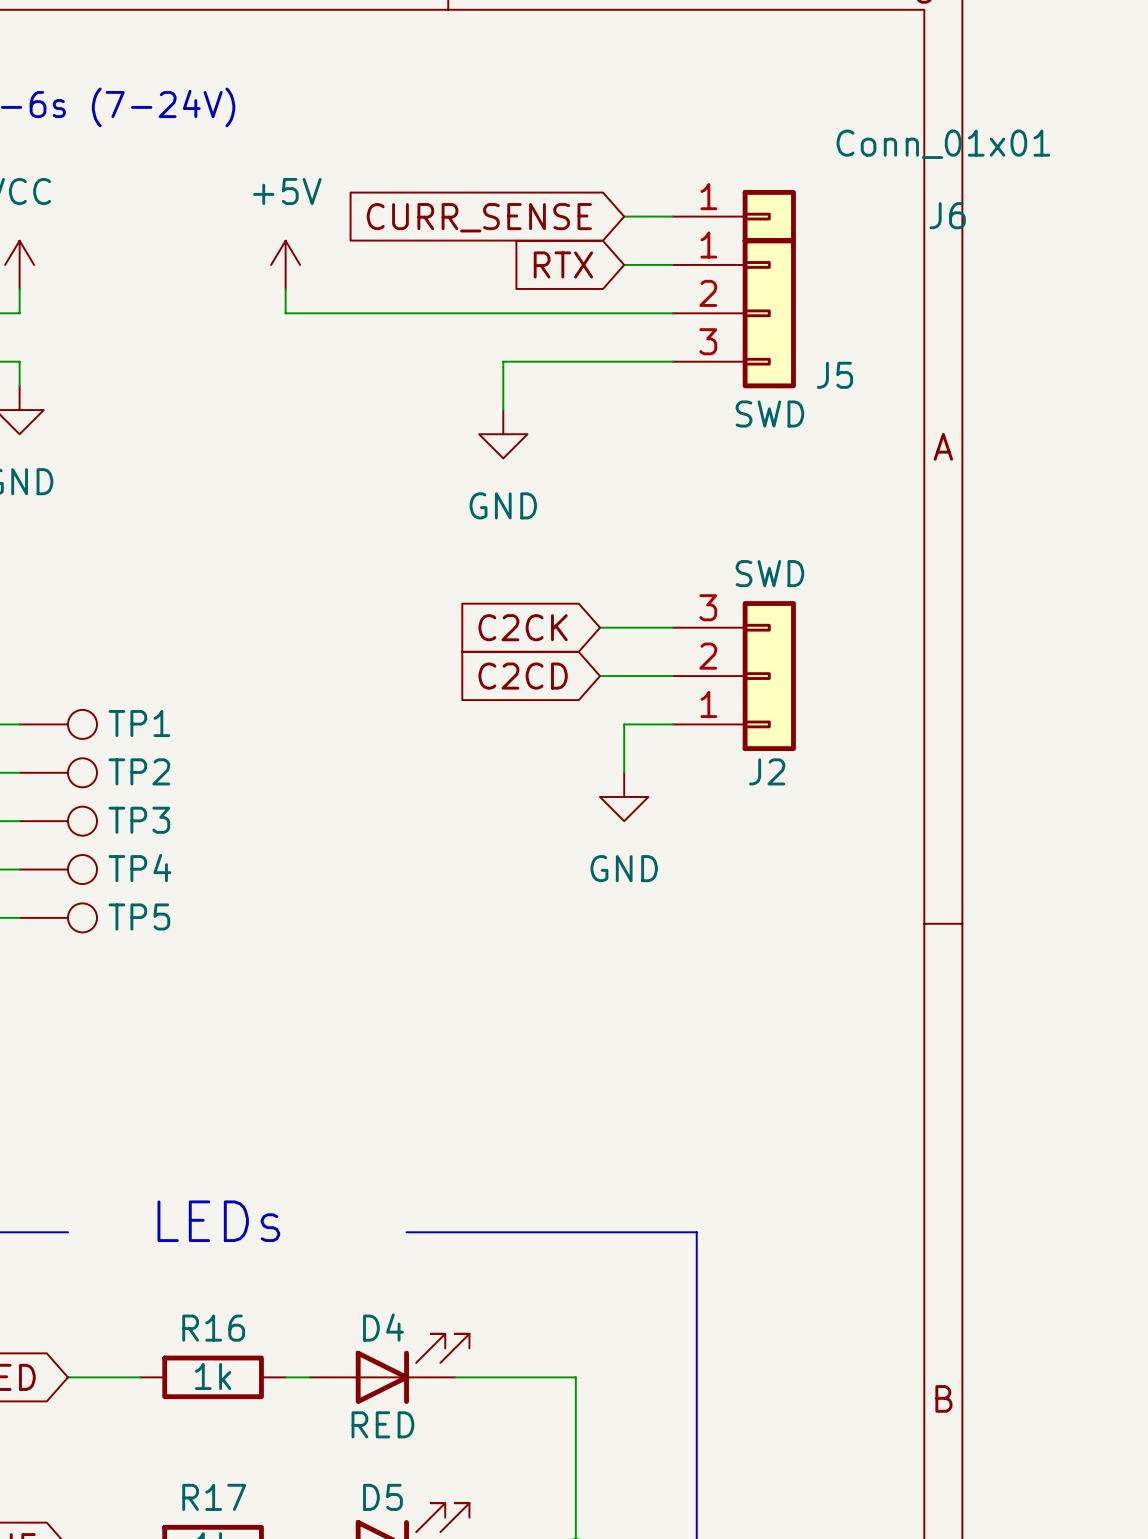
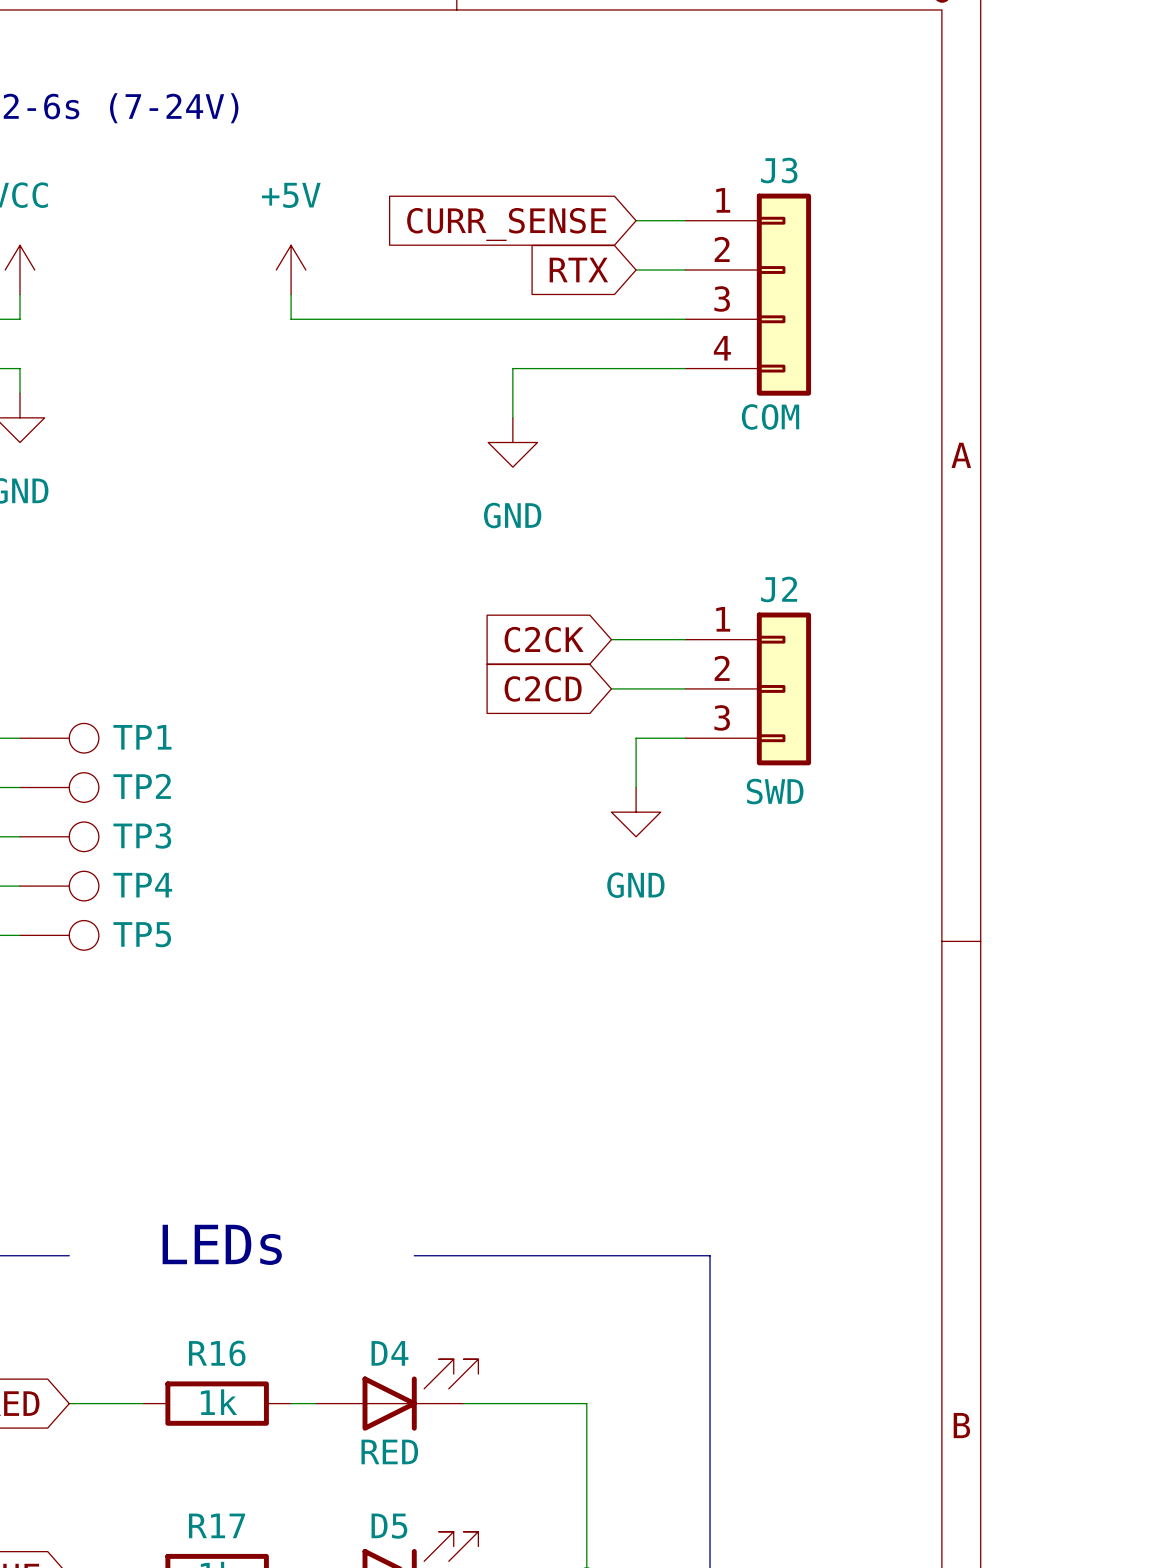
J6: Conn_01x01 (734, 216) -> none
J3: none -> COM (748, 294)
J5: SWD (734, 313) -> none
J2 flip: as is (769, 676) -> up-down (783, 688)

